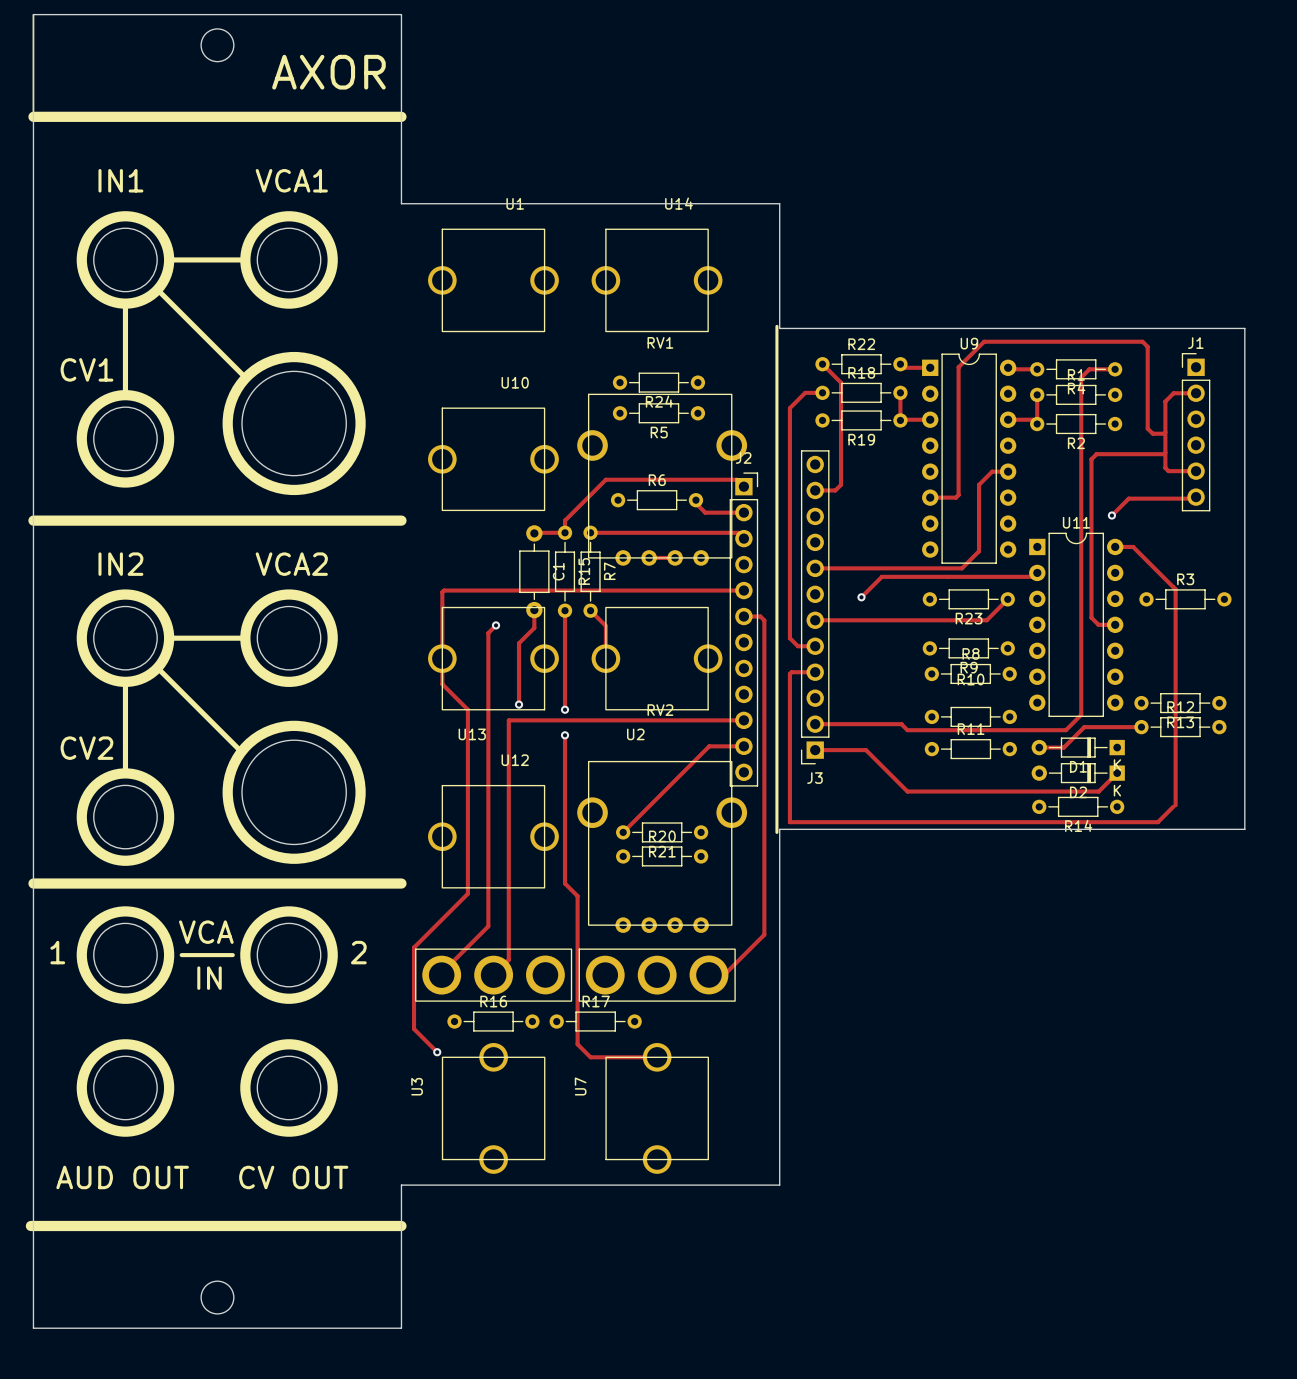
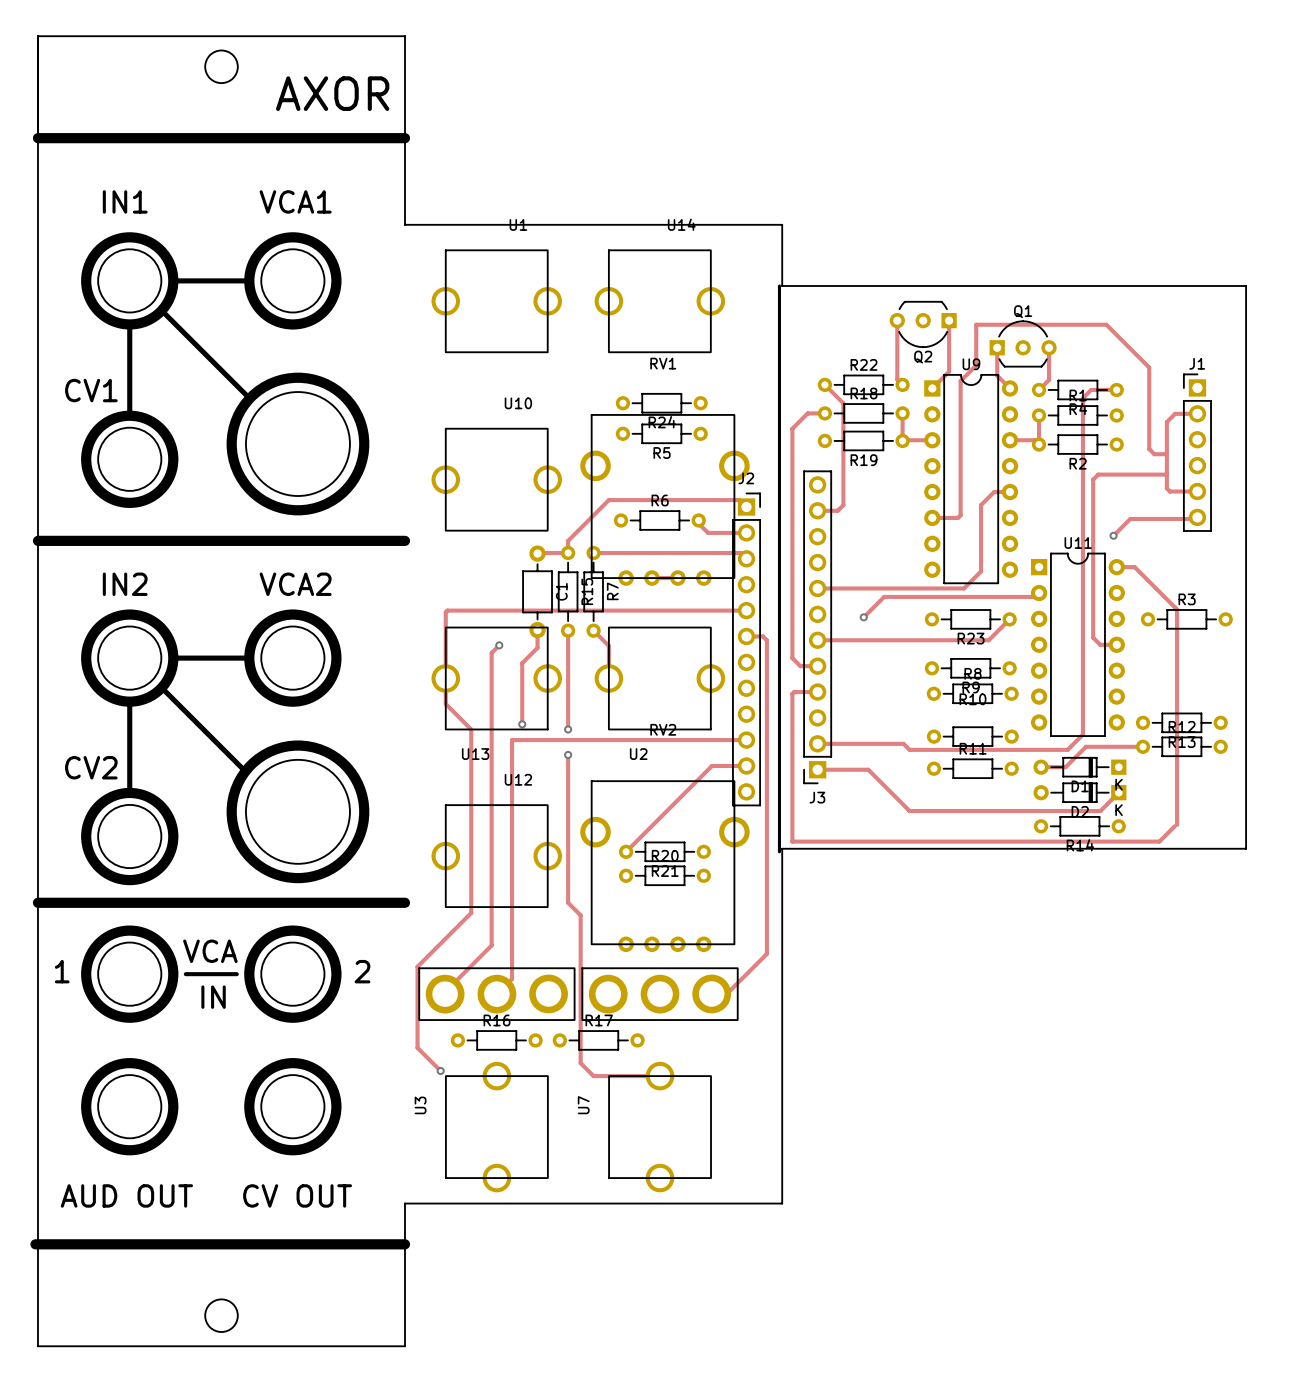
line: none -> (779, 285) (779, 347)
board edge: (779, 265) (779, 328) (1244, 328) -> (782, 285) (1246, 285) (1246, 349)
track: none -> (897, 320) (897, 379) (902, 384)
Q2: none -> (923, 324)
Q1: none -> (1023, 343)
track: none -> (997, 347) (997, 375) (1010, 388)
track: (1142, 341) (984, 341) (958, 367) -> (1144, 362) (1106, 324) (976, 324) (976, 365) (960, 381) (960, 387)
track: (904, 367) (930, 367) -> (949, 320) (949, 371) (932, 388)
track: (1009, 369) (1037, 369) -> (1049, 347) (1049, 379) (1039, 389)

